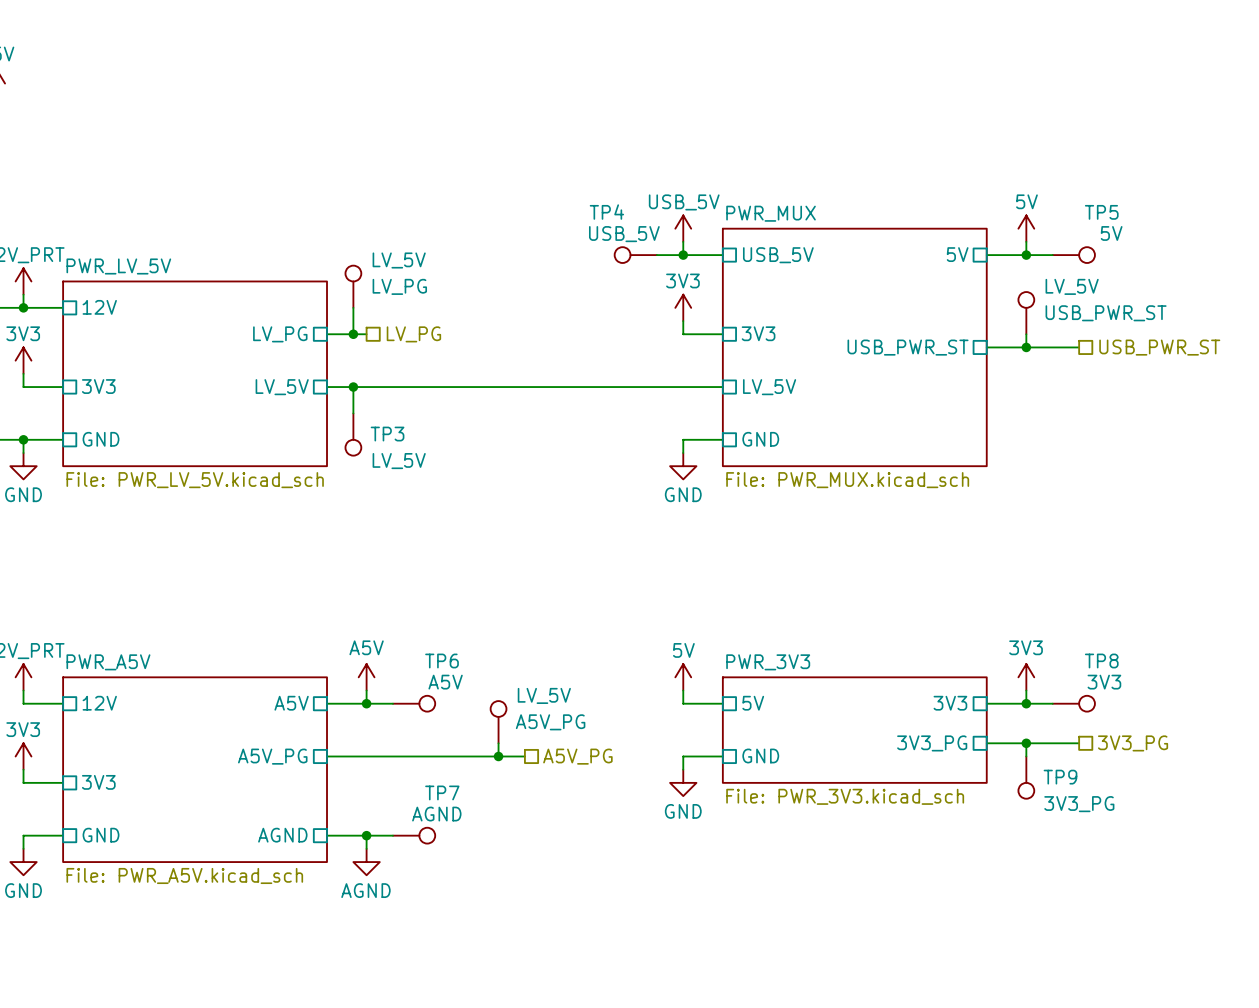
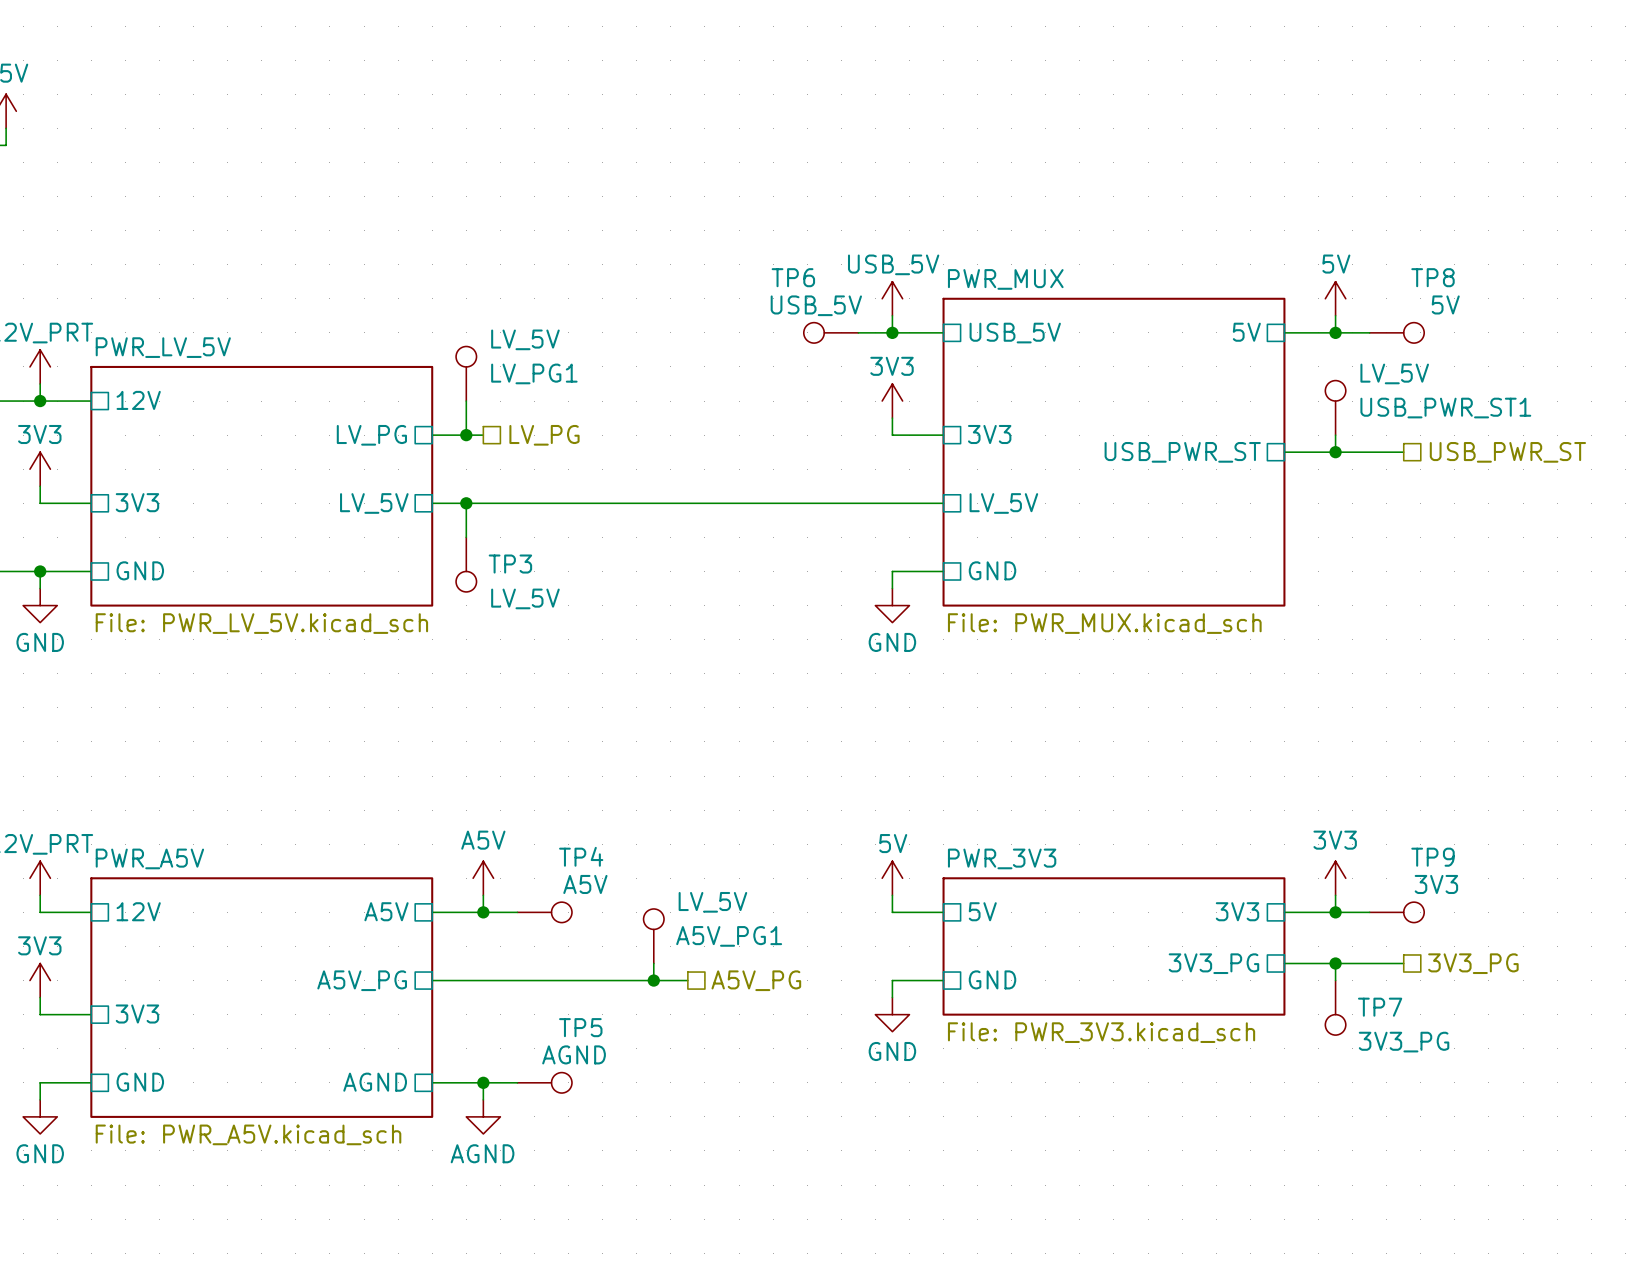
TP4 name: TP4 (606, 212) -> TP6 (793, 277)
TP5 name: TP5 (1101, 212) -> TP8 (1432, 277)
LV_PG name: LV_PG (399, 286) -> LV_PG1 (534, 373)
USB_PWR_ST name: USB_PWR_ST (1106, 313) -> USB_PWR_ST1 (1445, 408)
TP6 name: TP6 (442, 660) -> TP4 (581, 856)
TP8 name: TP8 (1101, 660) -> TP9 (1432, 857)
A5V_PG name: A5V_PG (550, 722) -> A5V_PG1 (729, 936)
TP9 name: TP9 (1060, 777) -> TP7 (1380, 1007)
TP7 name: TP7 (442, 792) -> TP5 (580, 1027)

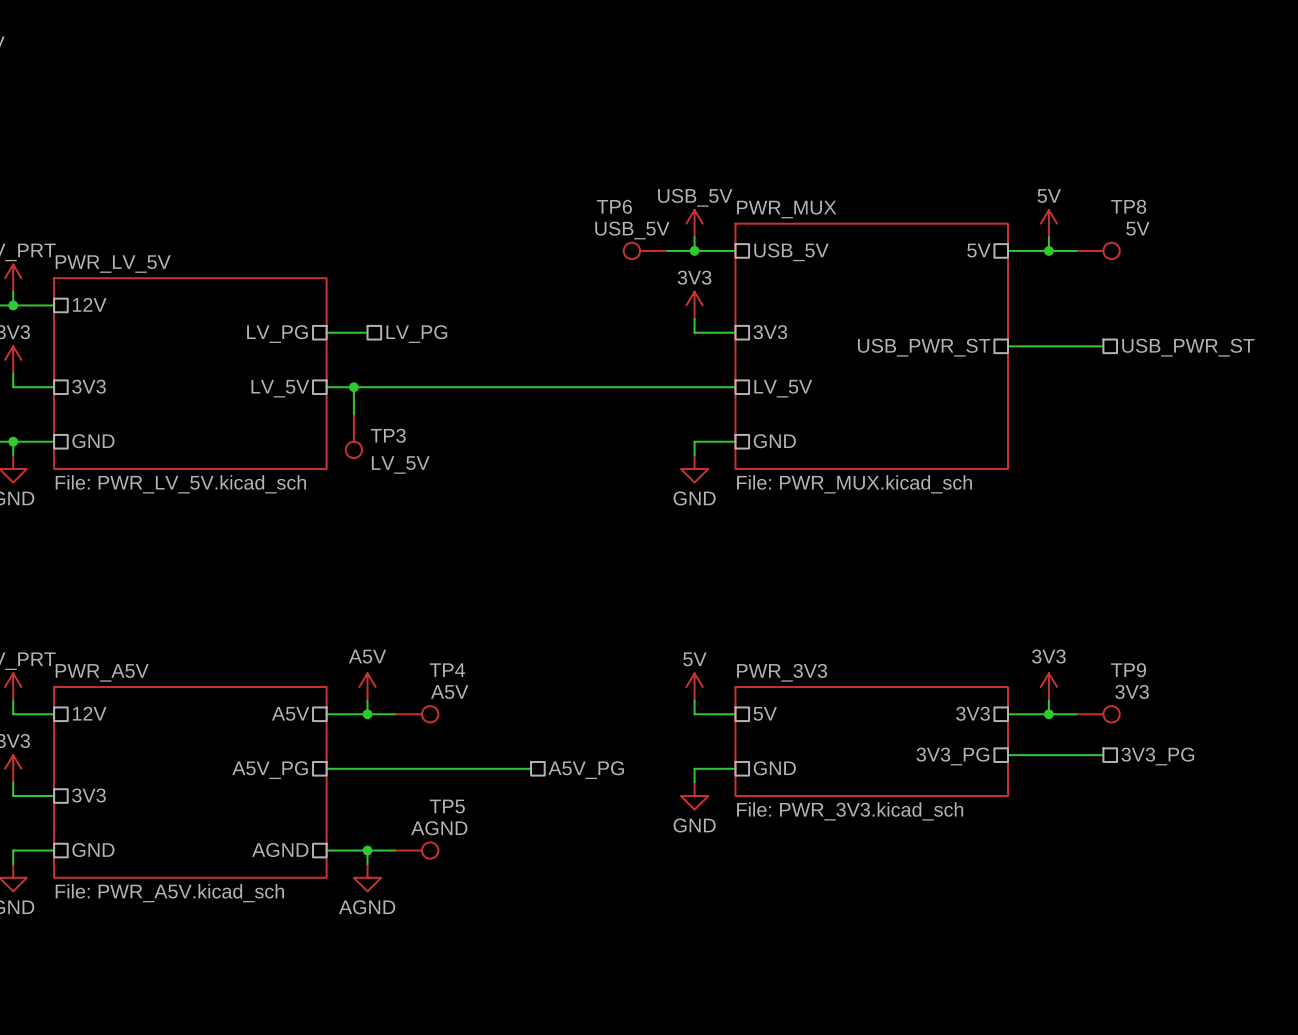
LV_PG1: LV_5V (466, 373) -> none
wire: (466, 401) (466, 435) -> none
USB_PWR_ST1: LV_5V (1335, 407) -> none
junction: (466, 435) -> none
wire: (1335, 435) (1335, 452) -> none
junction: (1335, 452) -> none
A5V_PG1: LV_5V (653, 936) -> none
wire: (653, 963) (653, 980) -> none
wire: (1335, 963) (1335, 980) -> none
junction: (1335, 963) -> none
junction: (653, 980) -> none
TP7: 3V3_PG (1335, 1007) -> none

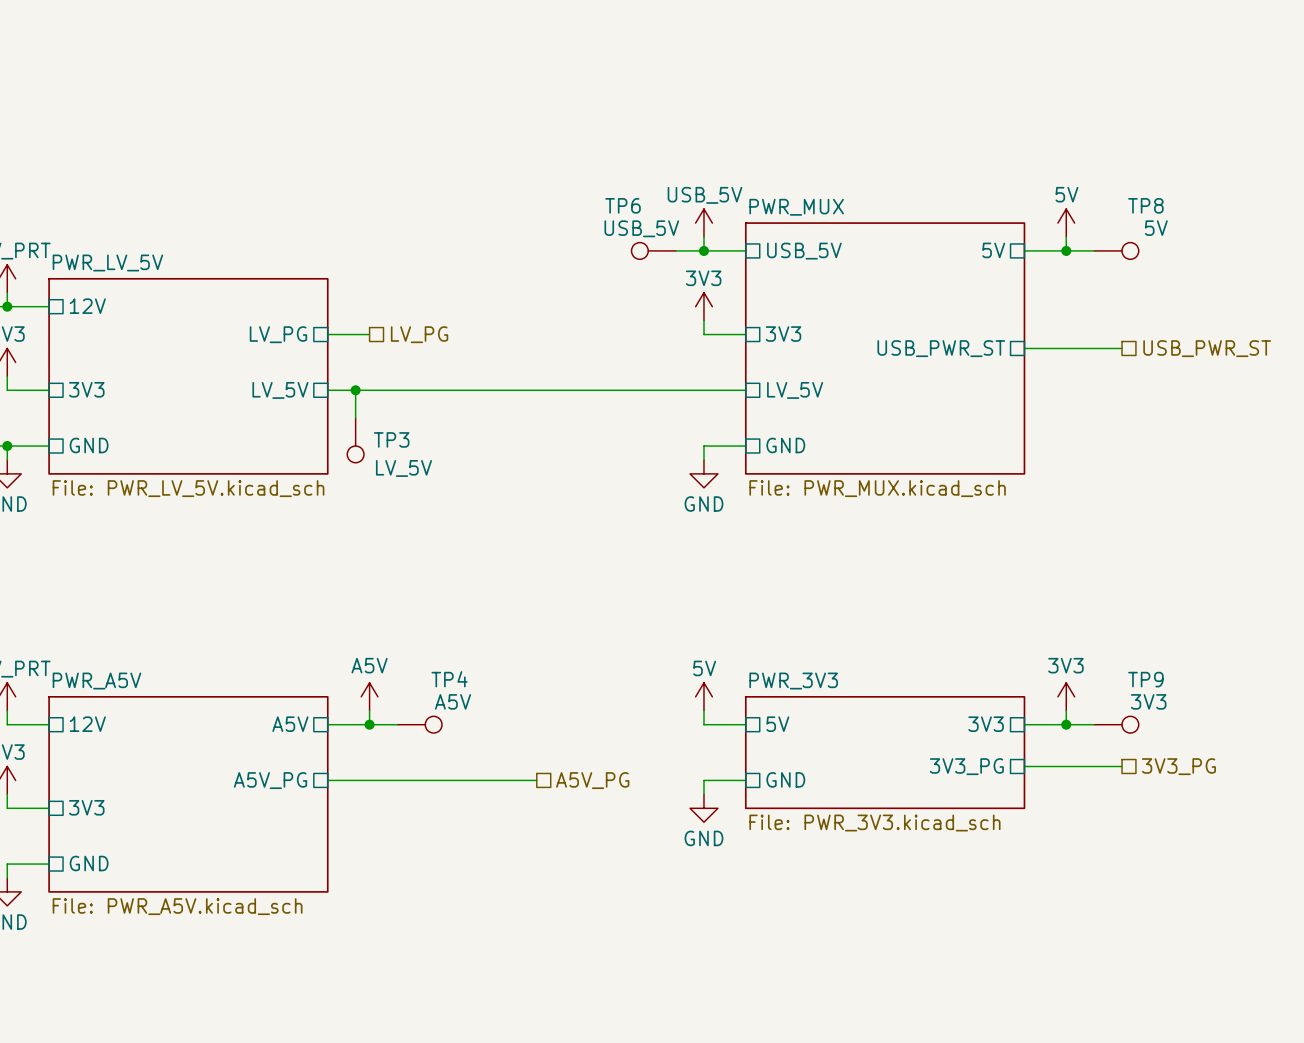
sheet pin: AGND (280, 850) -> none
wire: (326, 850) (394, 850) -> none
wire: (367, 850) (367, 864) -> none
junction: (367, 850) -> none
TP5: AGND (416, 850) -> none
power symbol: AGND (367, 877) -> none

